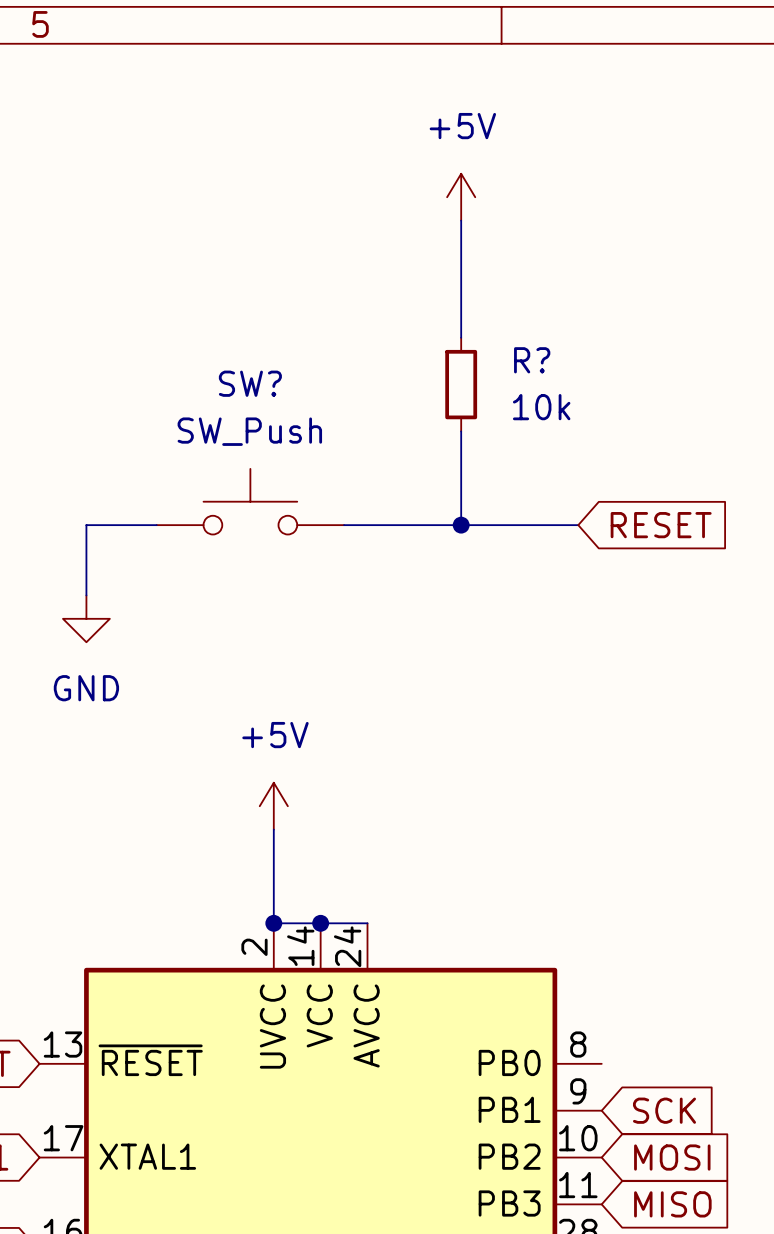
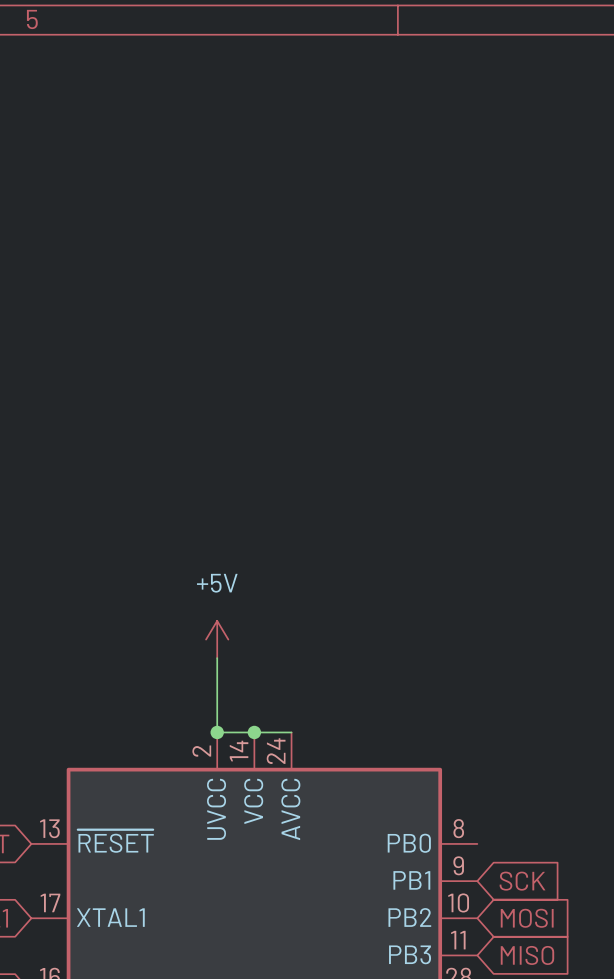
power symbol: +5V (461, 197) -> none
wire: (461, 220) (461, 337) -> none
R?: 10k (461, 384) -> none
wire: (461, 431) (461, 525) -> none
SW?: SW_Push (250, 501) -> none
wire: (156, 525) (86, 525) (86, 595) -> none
wire: (344, 525) (578, 525) -> none
junction: (461, 525) -> none
global label: RESET (661, 525) -> none
power symbol: GND (86, 618) -> none

